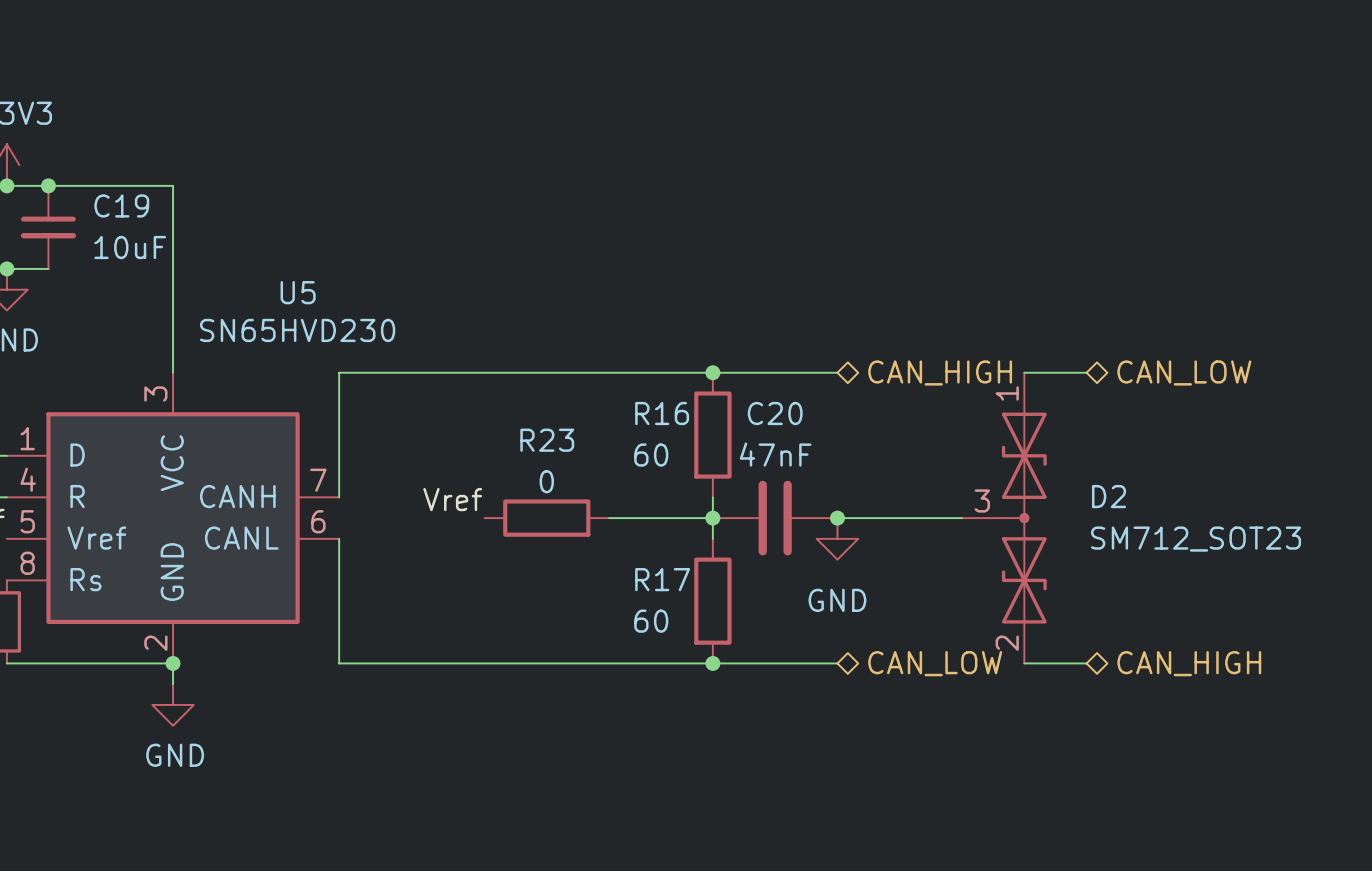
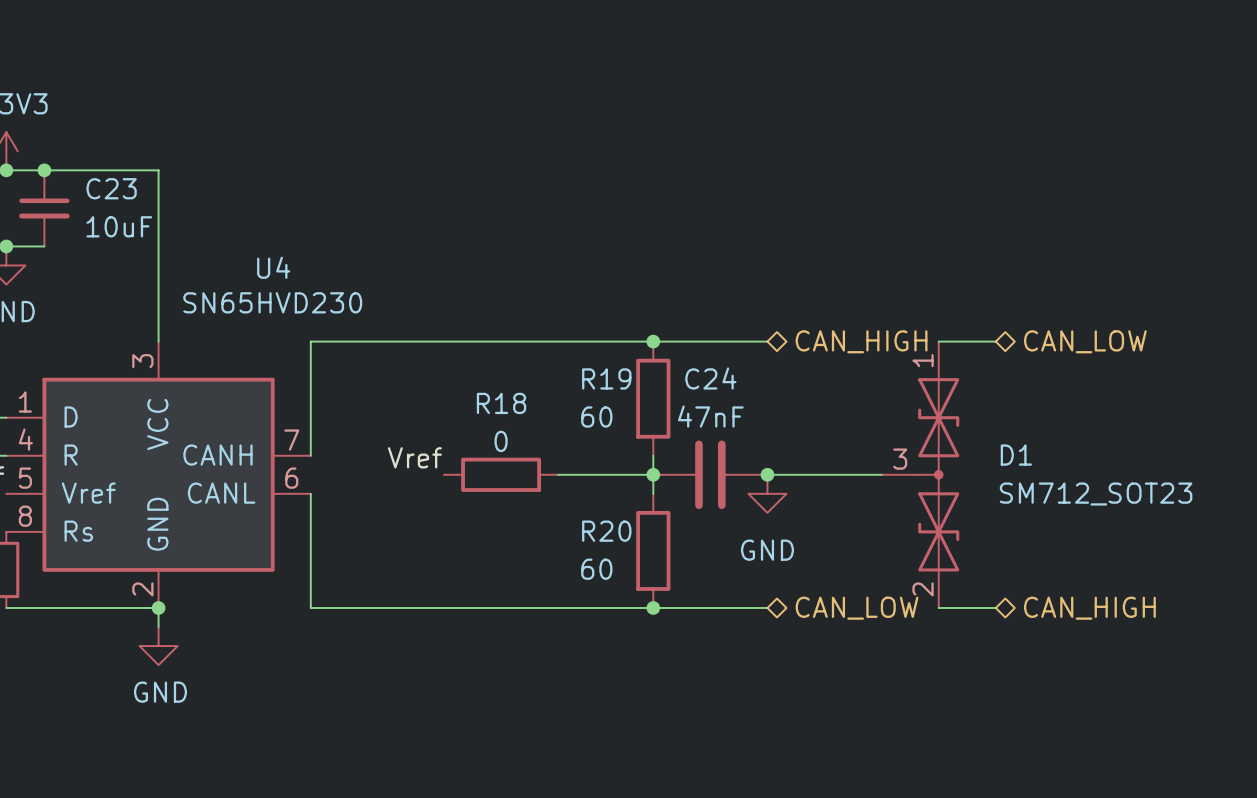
C19 name: C19 (121, 205) -> C23 (111, 188)
U5 name: U5 (298, 292) -> U4 (273, 267)
R16 name: R16 (662, 413) -> R19 (606, 378)
C20 name: C20 (775, 413) -> C24 (710, 378)
R23 name: R23 (547, 440) -> R18 (501, 403)
D2 name: D2 (1109, 496) -> D1 (1016, 455)
R17 name: R17 (662, 579) -> R20 (606, 531)

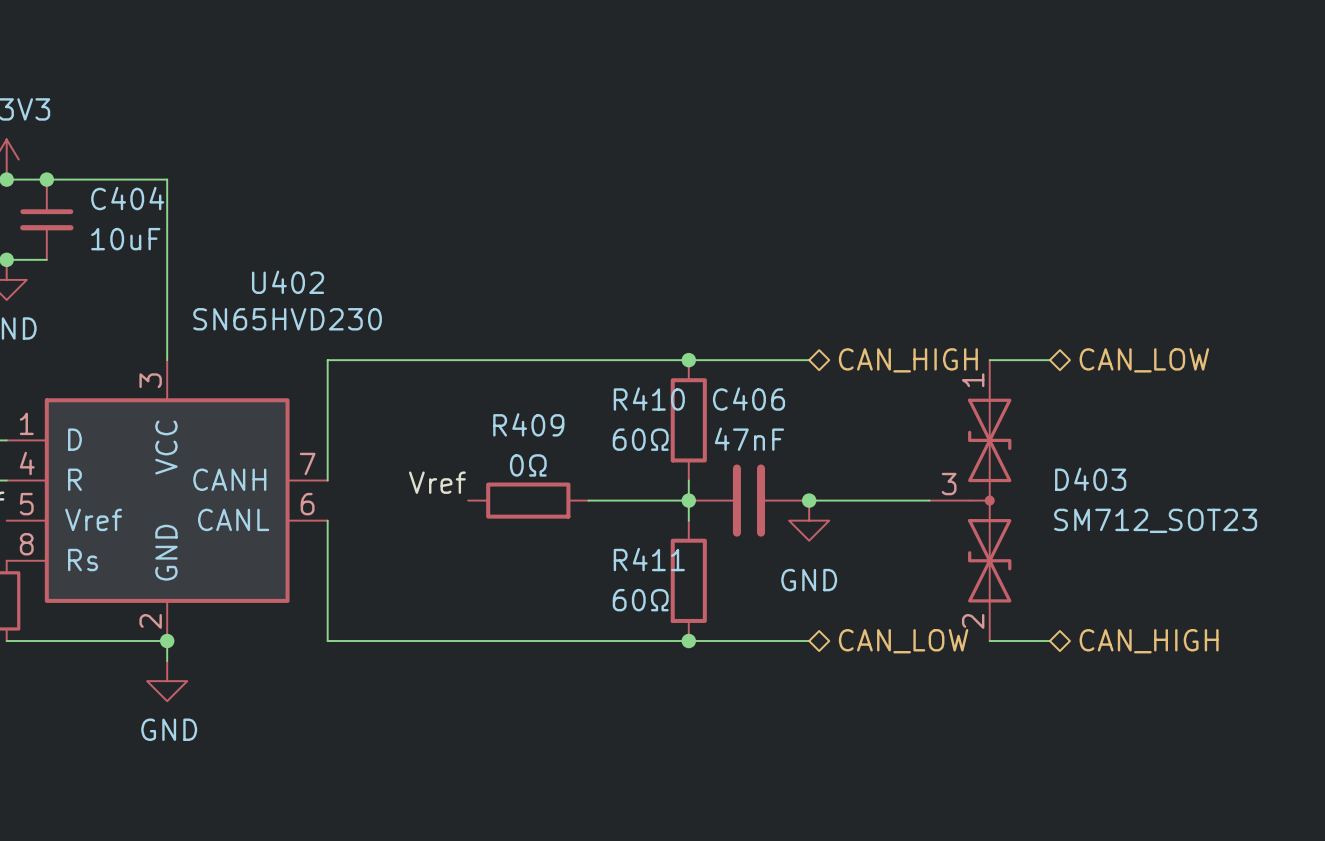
C23 name: C23 (111, 188) -> C404 (127, 198)
U4 name: U4 (273, 267) -> U402 (288, 282)
R19 name: R19 (606, 378) -> R410 (649, 399)
C24 name: C24 (710, 378) -> C406 (748, 399)
R18 name: R18 (501, 403) -> R409 (528, 424)
R19 value: 60 (596, 417) -> 60Ω (640, 439)
R18 value: 0 (501, 441) -> 0Ω (528, 465)
D1 name: D1 (1016, 455) -> D403 (1090, 479)
R20 name: R20 (606, 531) -> R411 (649, 559)
R20 value: 60 (596, 569) -> 60Ω (640, 600)

